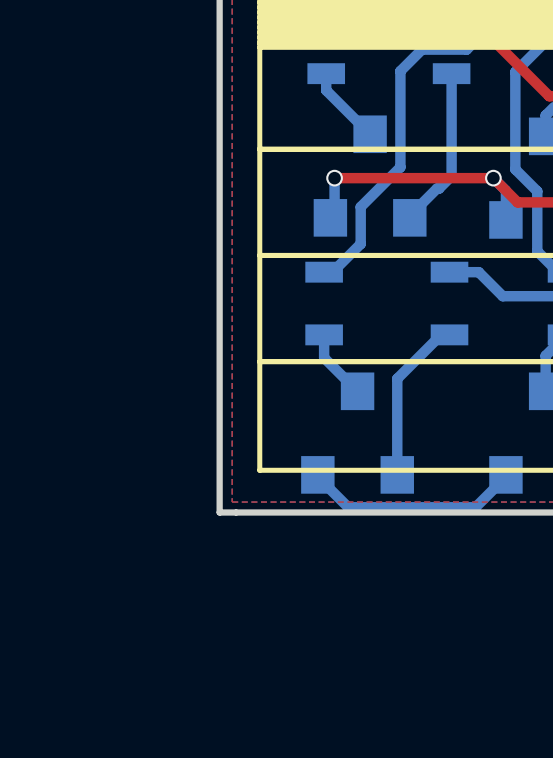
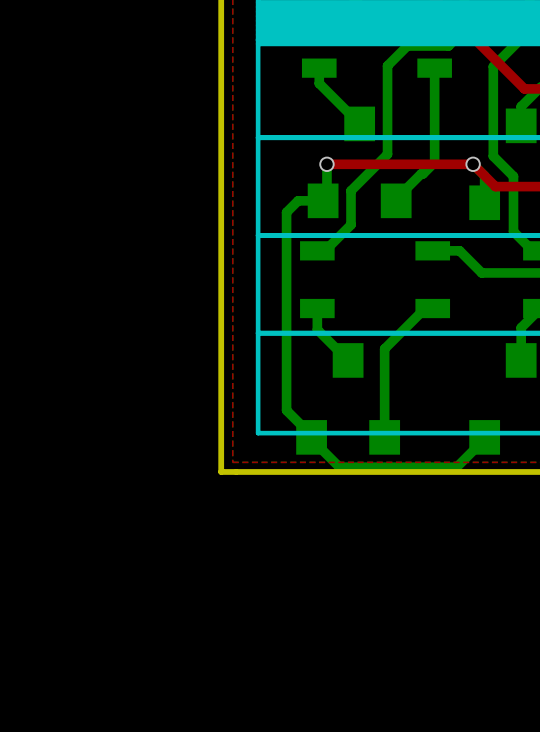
bottom track: none -> (323, 200) (298, 200) (286, 212) (286, 410) (311, 437)

